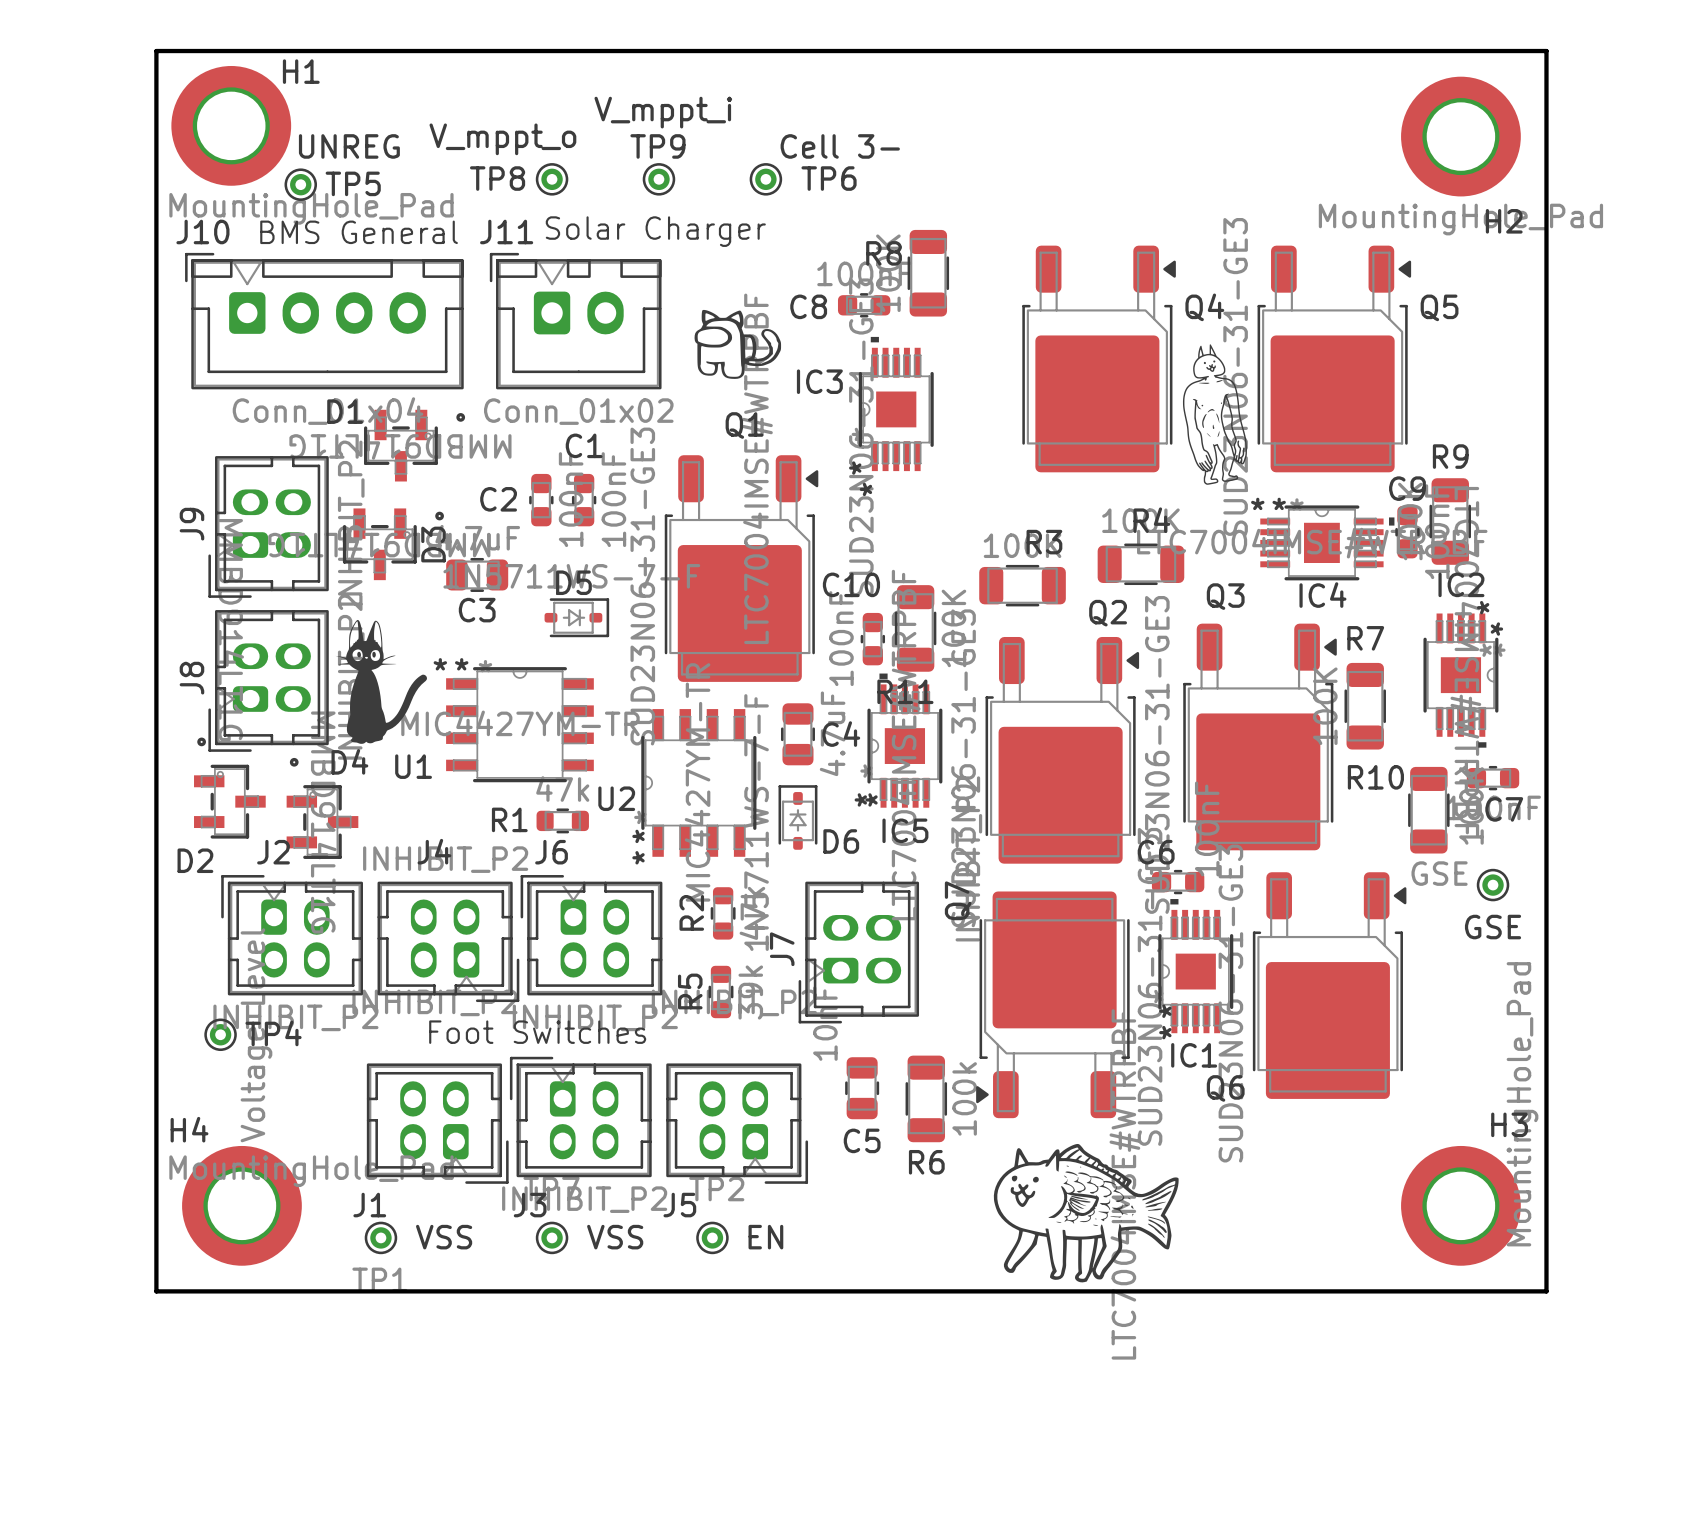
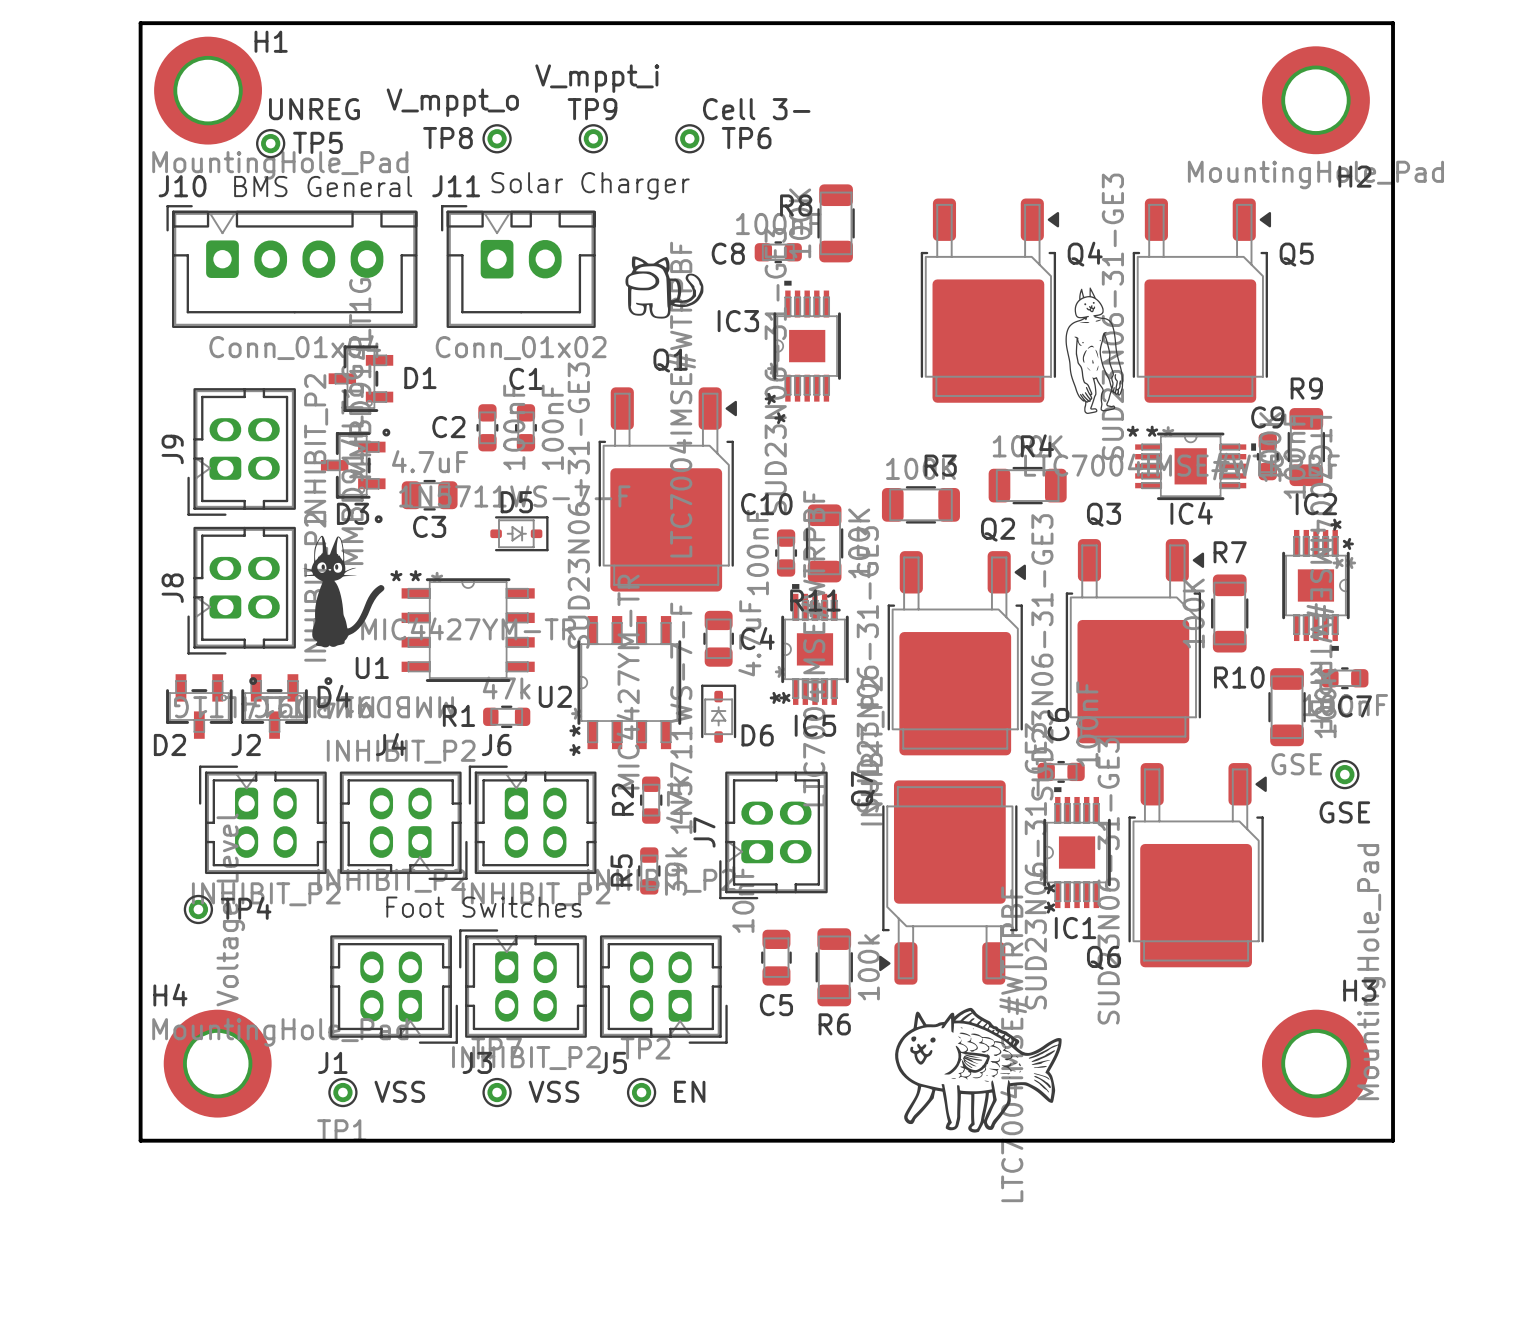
D1 name position: D1 (345, 411) -> D1 (420, 377)
D1 rotation: 0° (414, 445) -> 90° clockwise (360, 390)
D3 rotation: 0° (393, 544) -> 90° clockwise (353, 477)
D2 rotation: 0° (229, 788) -> 90° clockwise (211, 706)
D4 rotation: 0° (322, 808) -> 90° clockwise (286, 706)
C6 name rotation: 0° (1156, 852) -> 90° counterclockwise (1058, 724)

